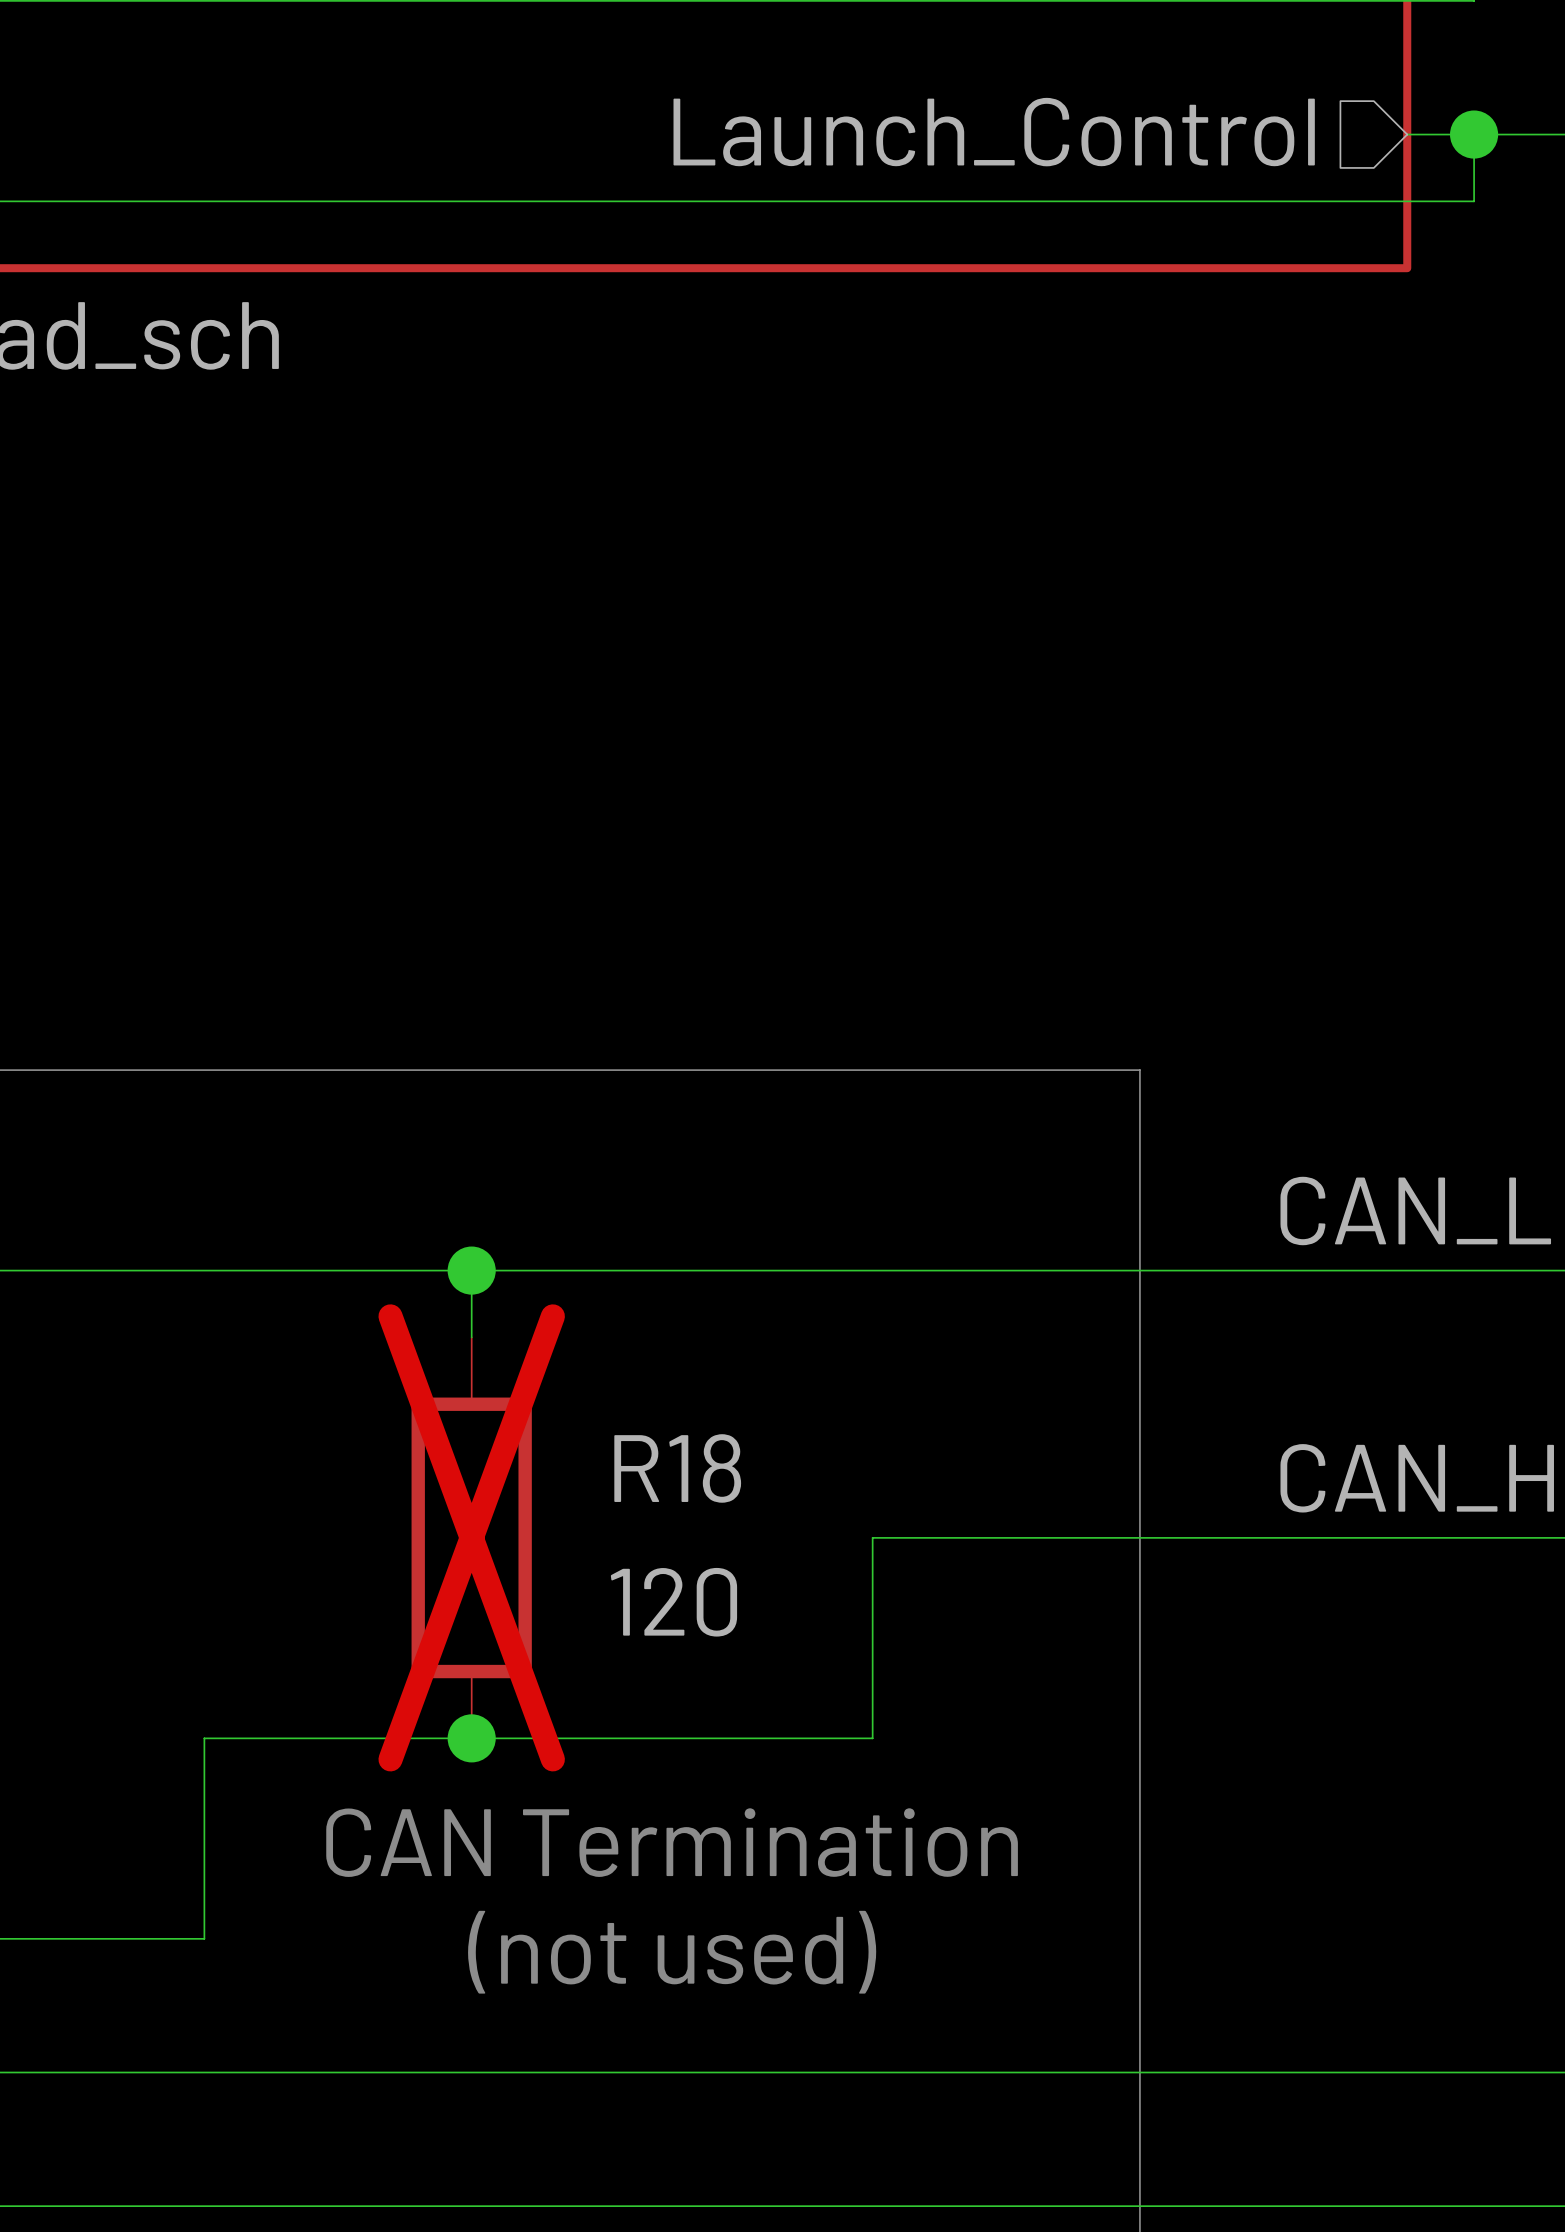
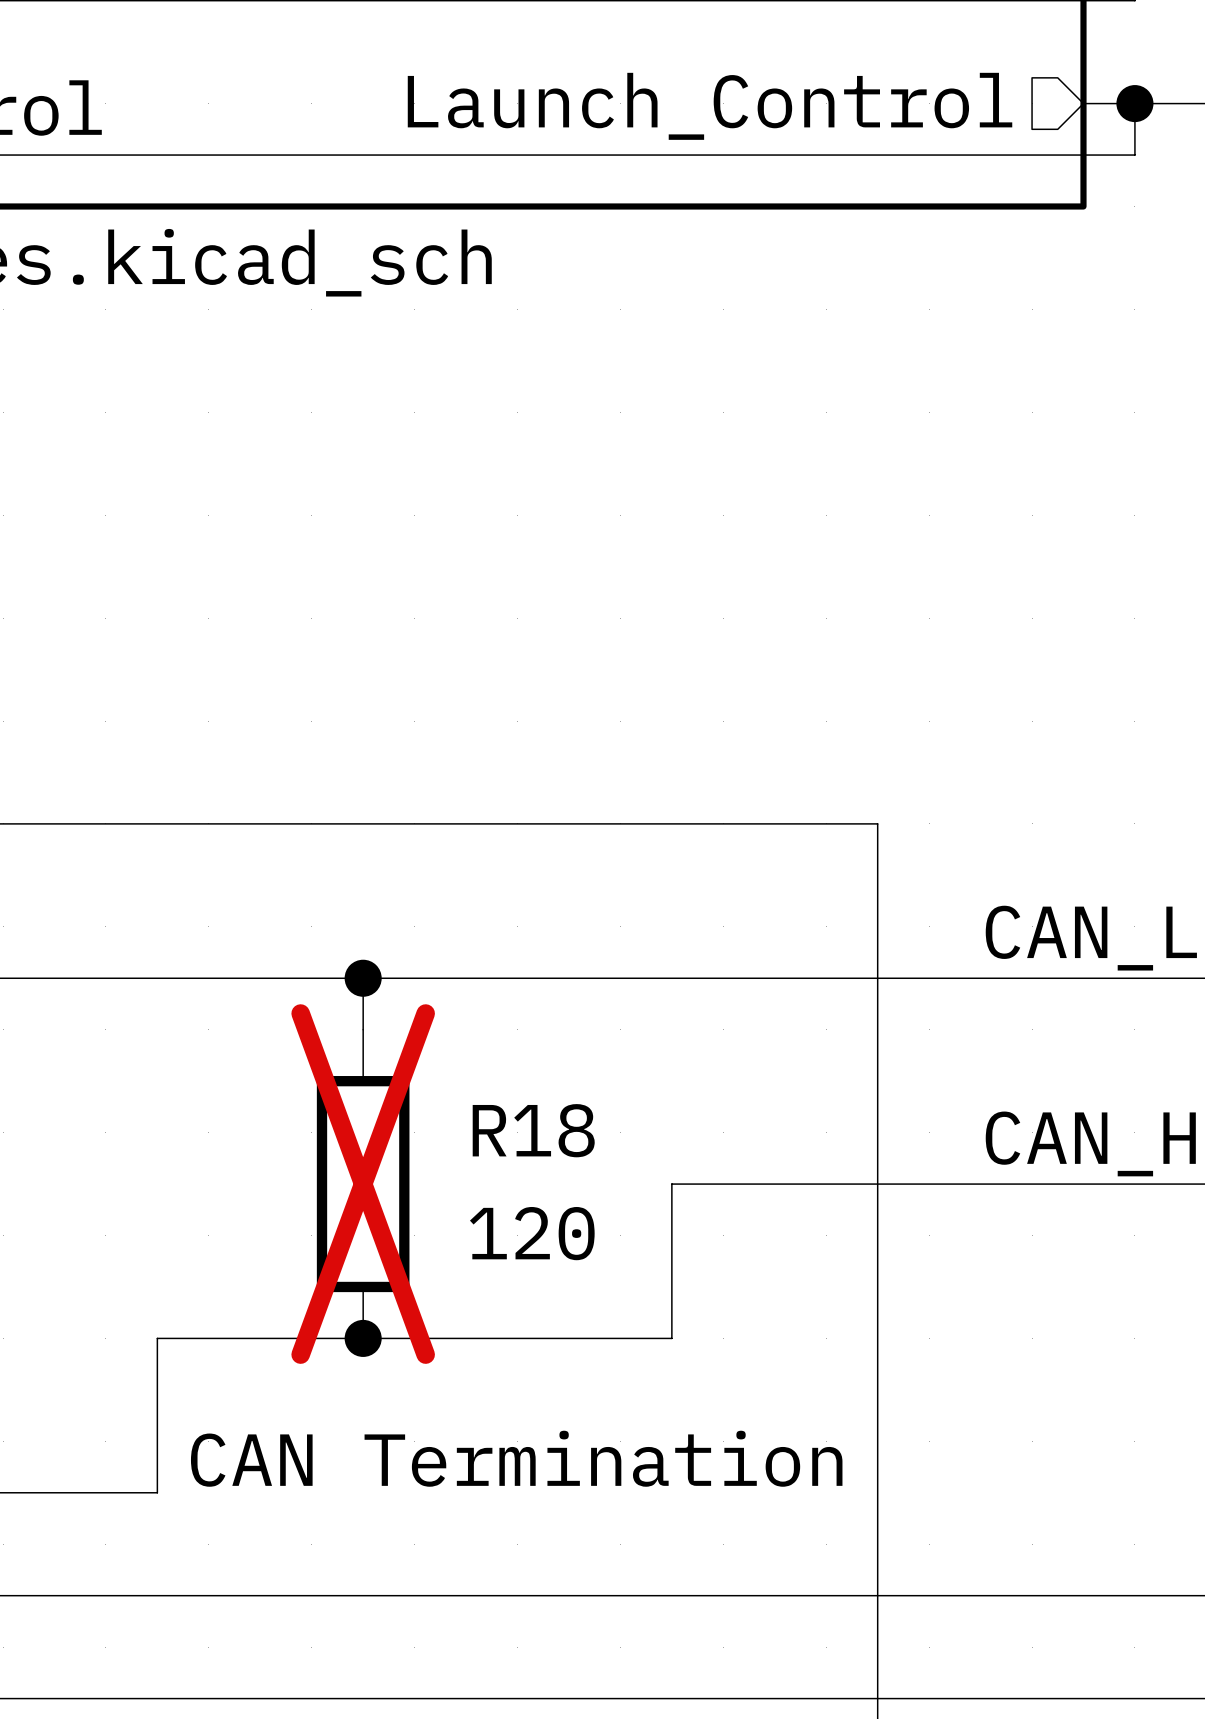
text position: CAN Termination (672, 1842) -> CAN Termination (516, 1458)
text: (not used) (672, 1952) -> none

